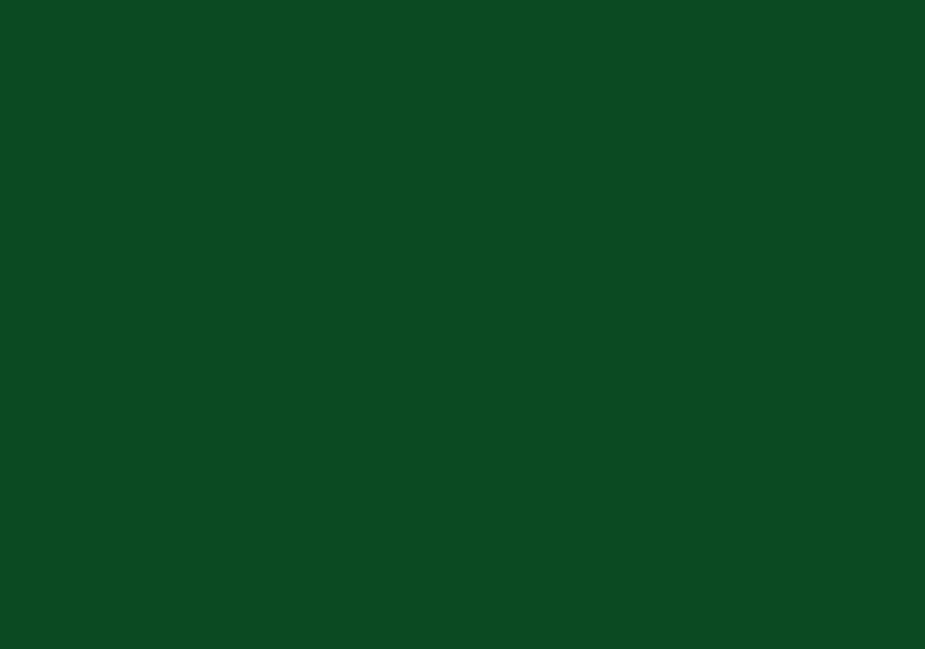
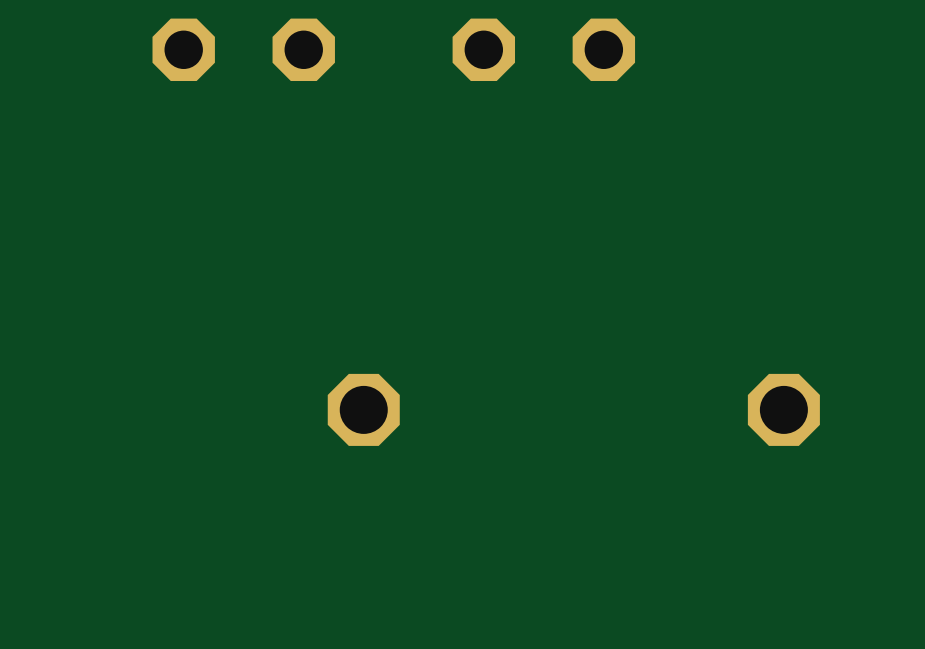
part: none -> (243, 49)
part: none -> (543, 49)
part: none -> (363, 409)
part: none -> (783, 409)

